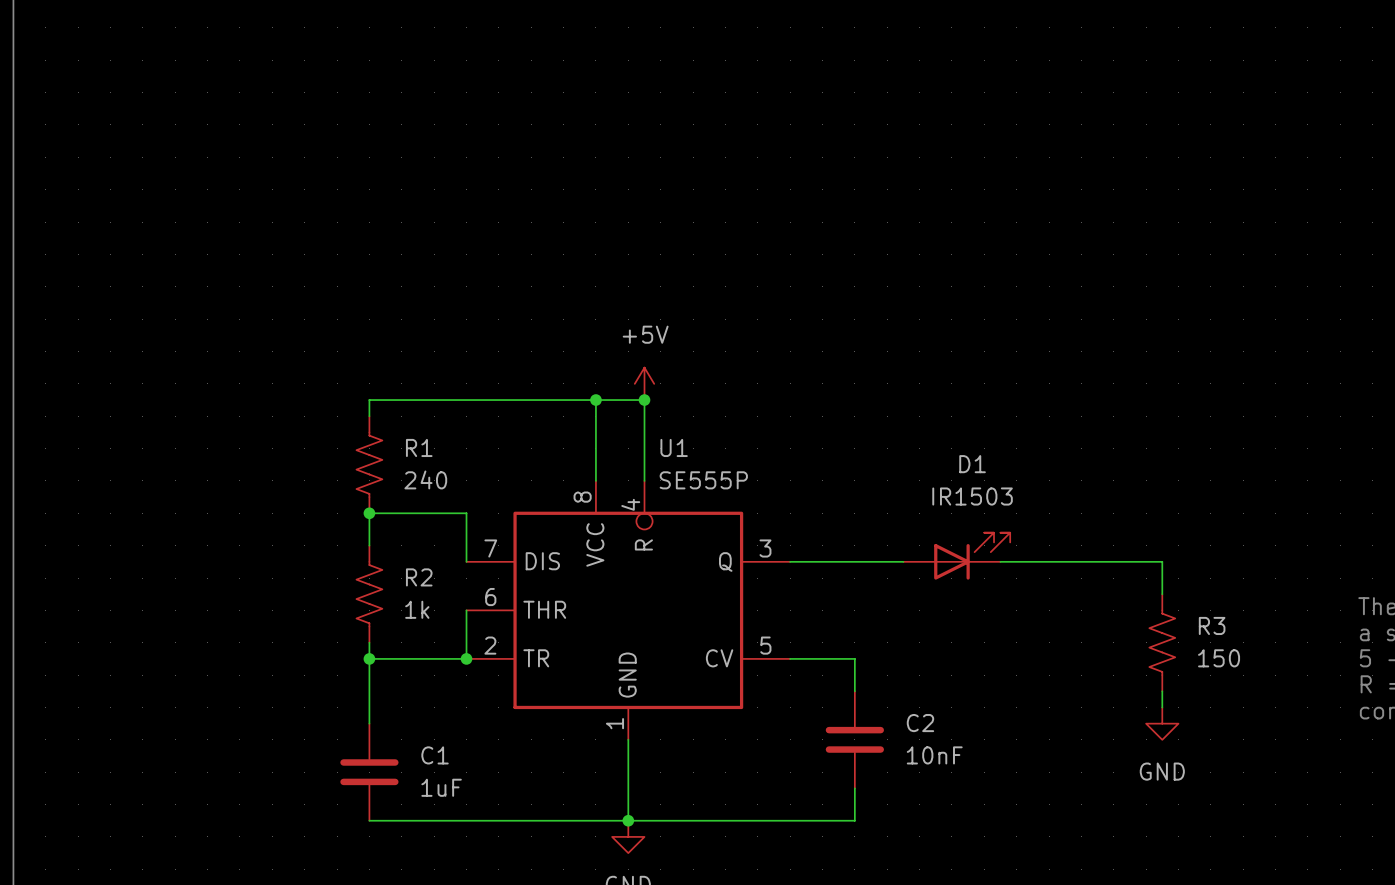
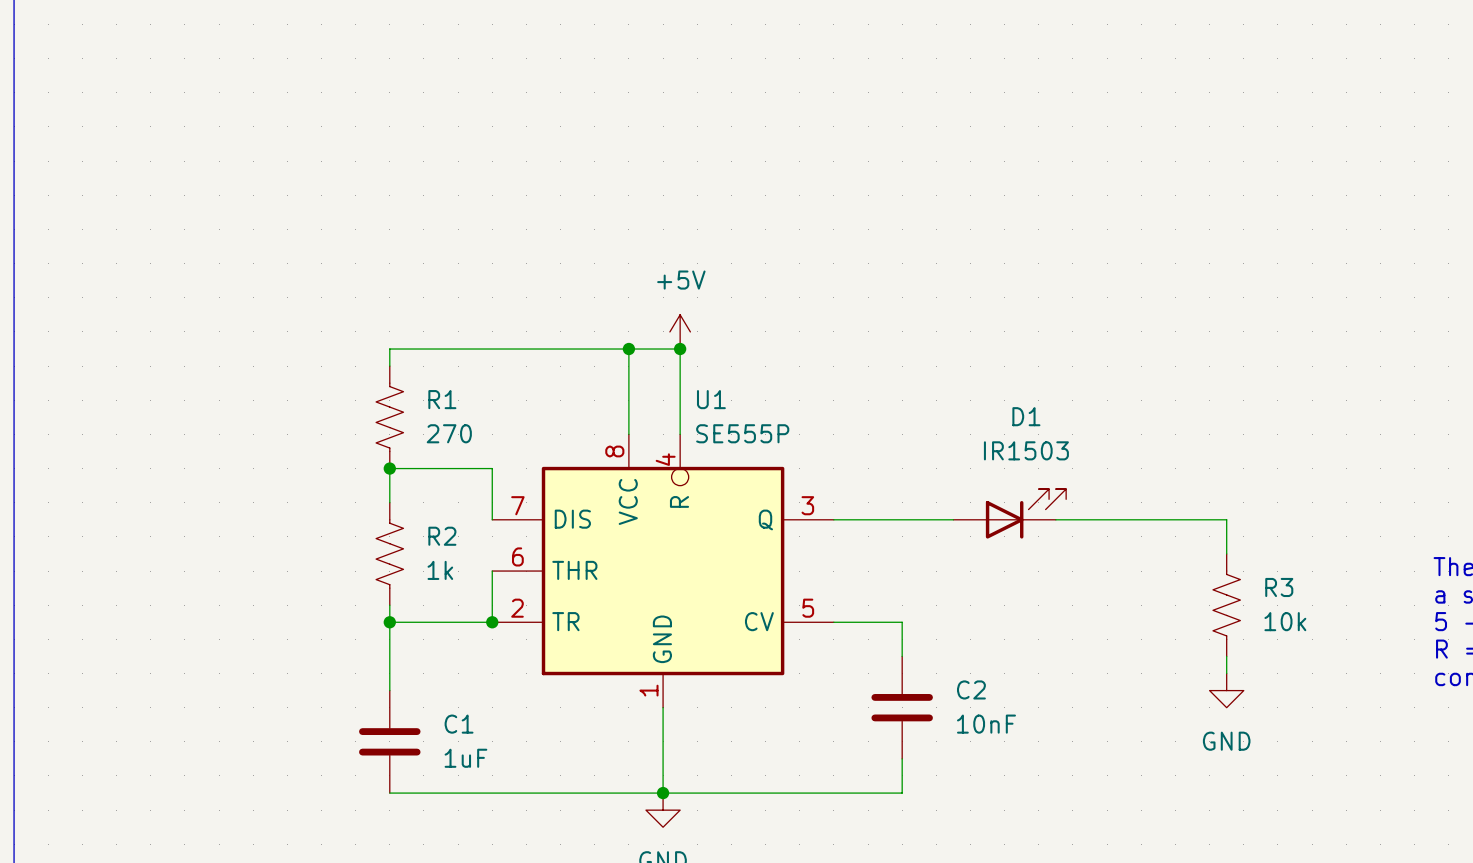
R1 value: 240 (425, 479) -> 270 (449, 433)
R3 value: 150 (1219, 658) -> 10k (1285, 621)

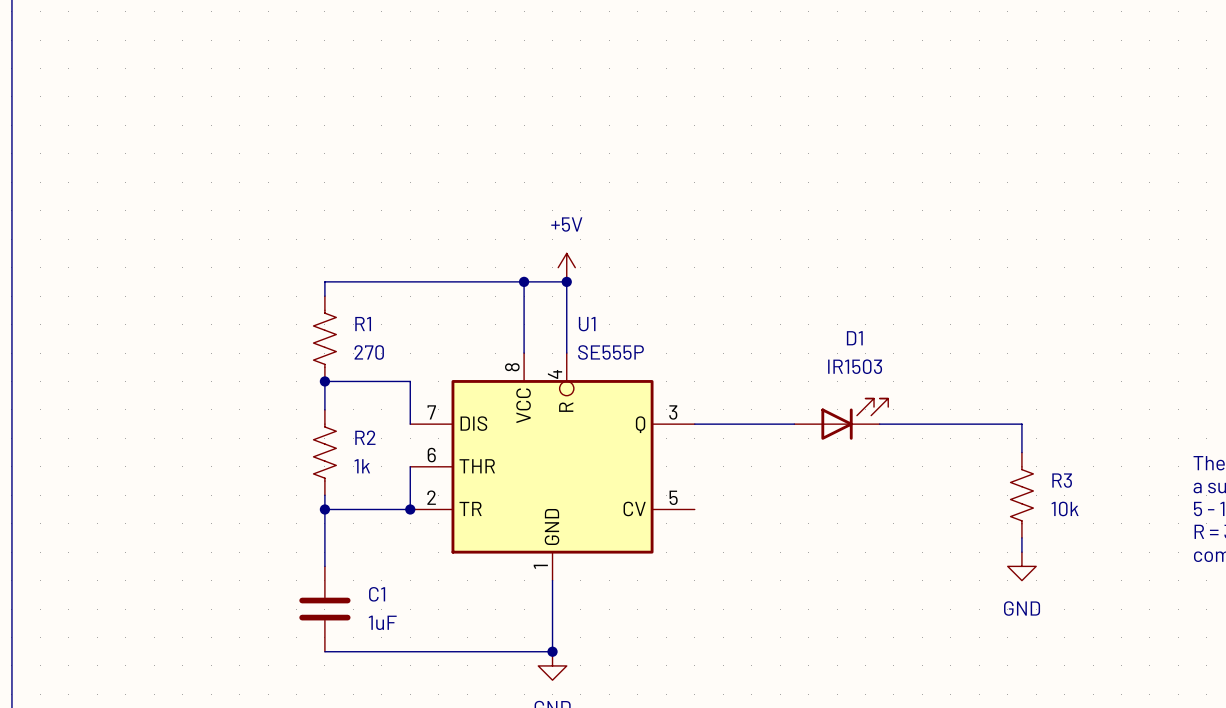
wire: (833, 622) (902, 622) (902, 656) -> none
C2: 10nF (902, 707) -> none
wire: (902, 758) (902, 793) (663, 793) -> none

